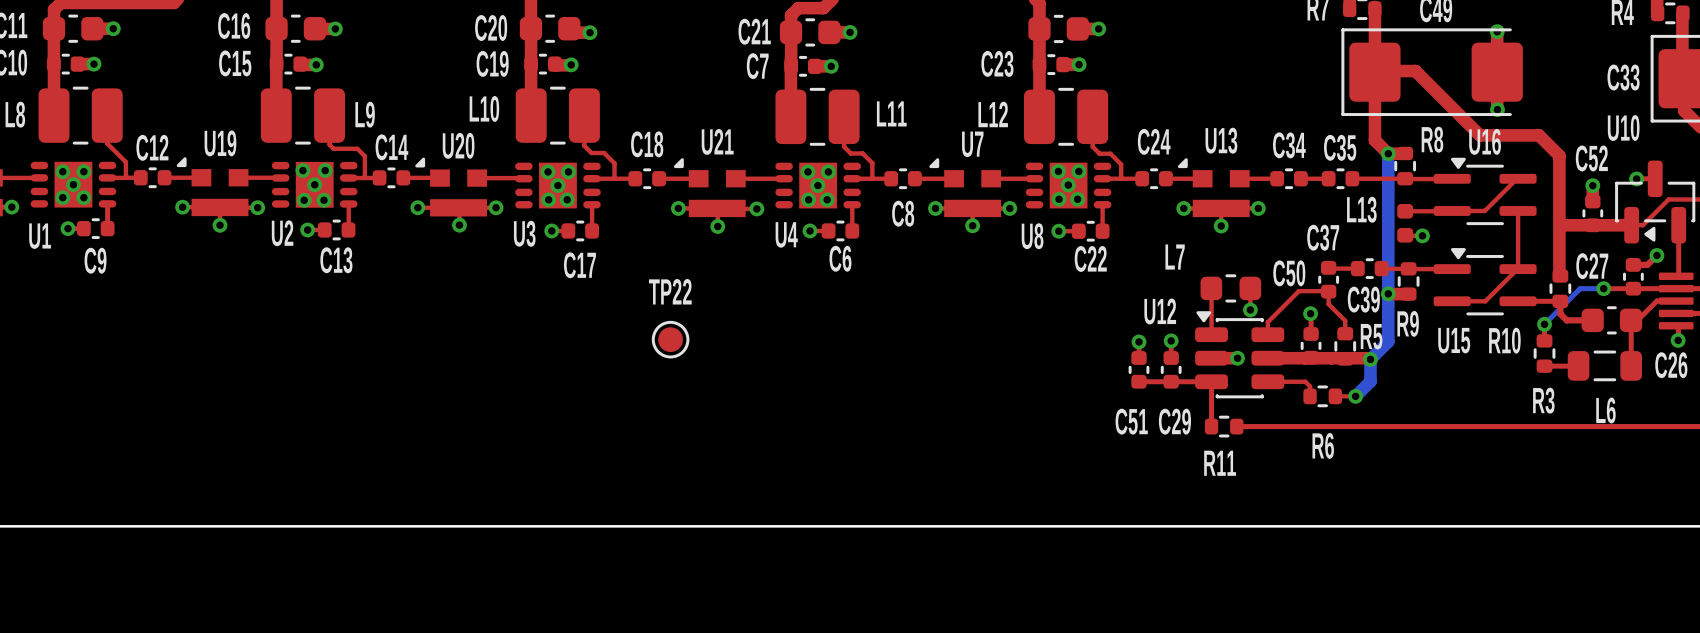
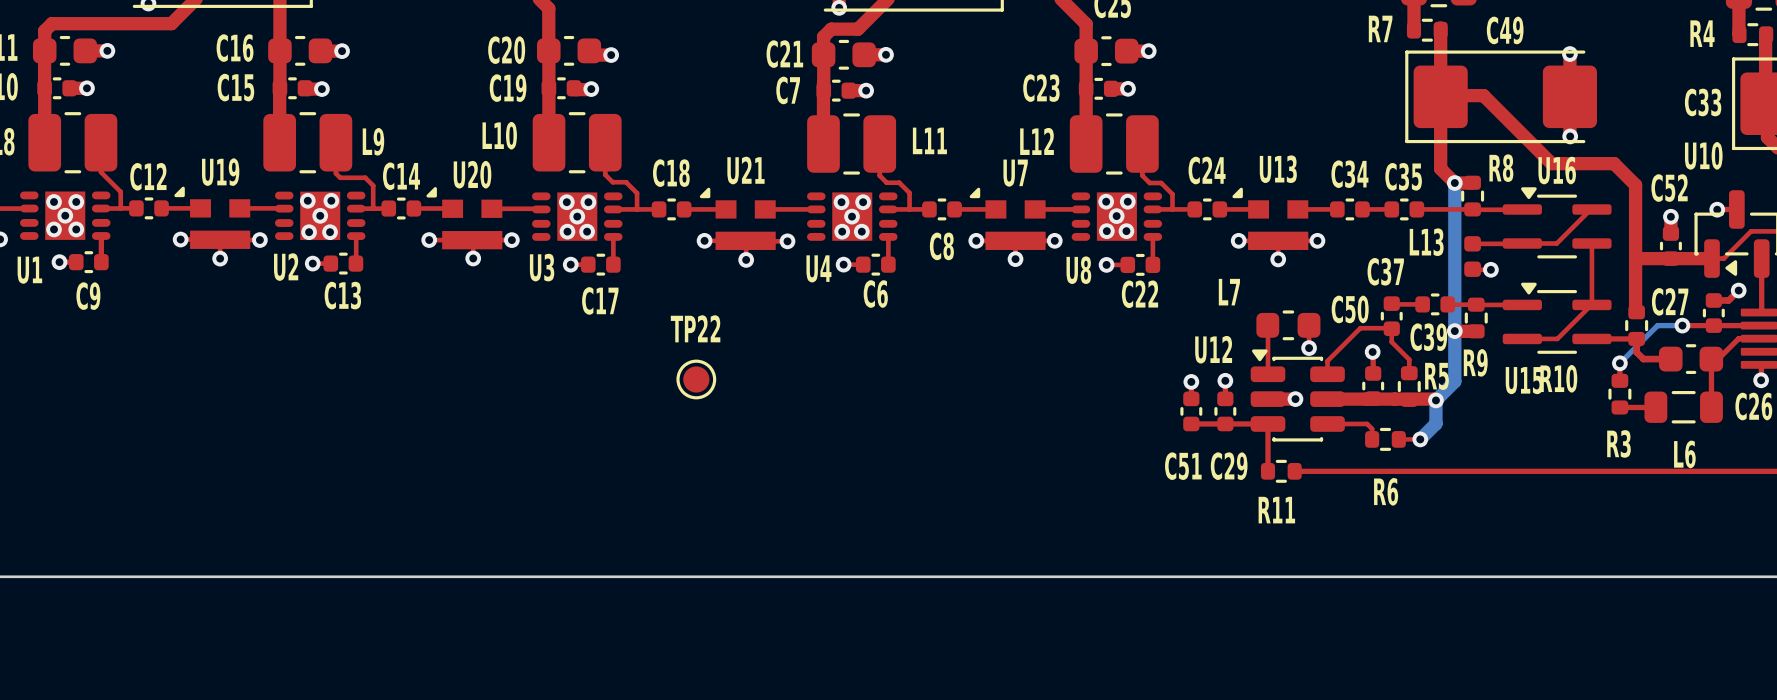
R10 name position: R10 (1504, 340) -> R10 (1558, 378)

